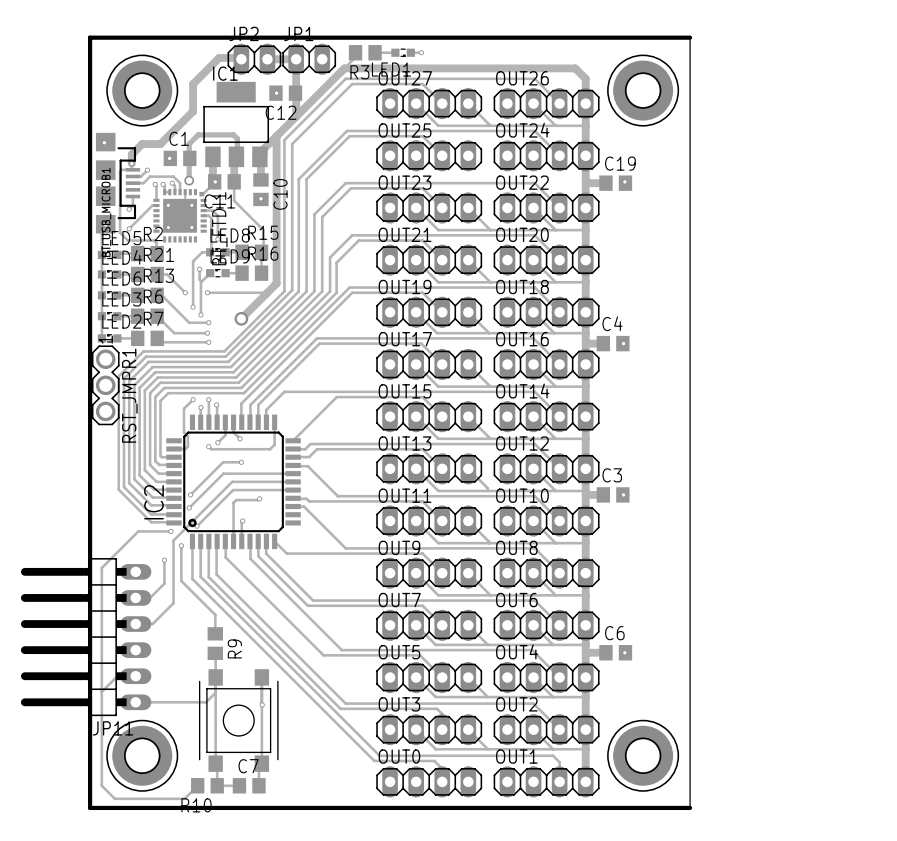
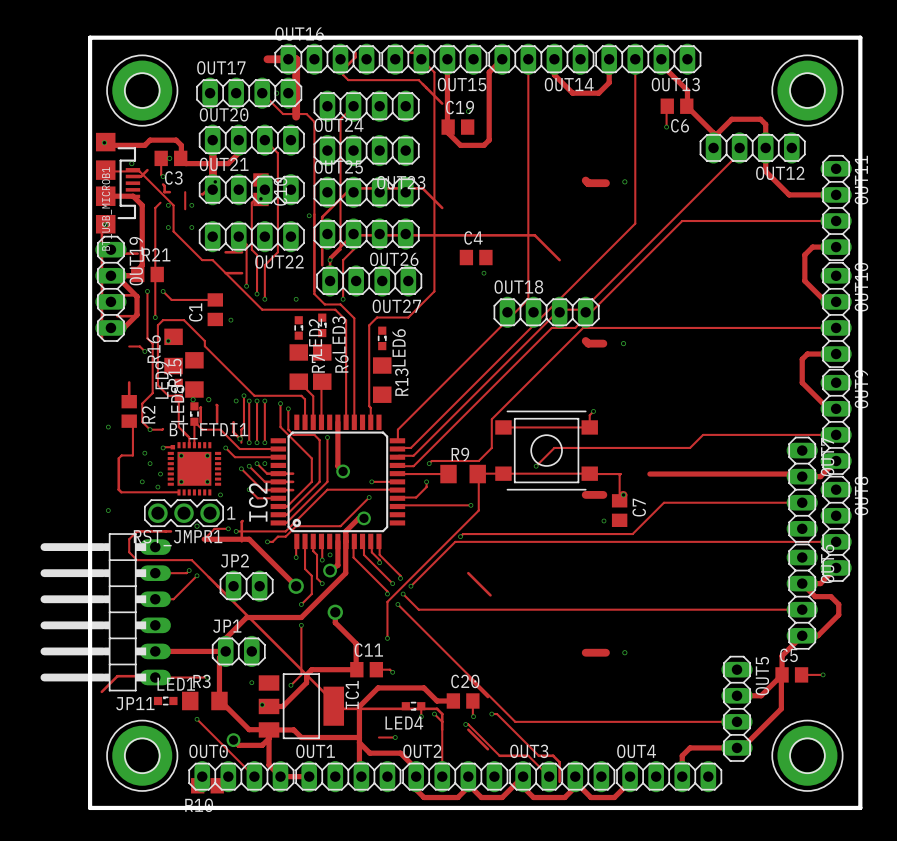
board edge: (690, 37) (690, 807) -> (690, 37) (860, 37) (860, 807) (690, 807)
R3 footprint: [348, 45, 382, 61] -> [182, 691, 228, 711]
track: (375, 52) (395, 52) -> none
LED1 rotation: 0° (403, 52) -> 180° (165, 700)
LED1 position: (403, 52) -> (165, 700)
via: (421, 52) -> none
track: (241, 59) (219, 57) (193, 84) (193, 111) (160, 144) (142, 144) (131, 154) (132, 169) (120, 171) (120, 232) (127, 240) (153, 240) (156, 243) (157, 253) -> none
JP2 position: (254, 59) -> (246, 586)
JP1 position: (309, 59) -> (238, 651)
track: none -> (421, 59) (434, 72) (434, 291) (408, 317) (377, 317) (369, 325) (370, 422)
track: none -> (447, 59) (448, 132) (460, 145) (483, 145) (489, 140) (489, 72) (502, 59)
track: none -> (528, 59) (528, 299) (397, 429) (397, 440)
track: none -> (554, 59) (554, 74) (572, 93) (598, 93) (609, 82) (609, 59)
track: none -> (635, 59) (635, 223) (410, 447) (397, 449)
track: none -> (661, 59) (661, 64) (687, 90) (686, 106) (713, 132) (713, 147)
R3 name position: R3 (359, 72) -> R3 (201, 681)
OUT27 name position: OUT27 (405, 78) -> OUT27 (396, 306)
OUT26 name position: OUT26 (522, 78) -> OUT26 (394, 259)
track: (422, 84) (352, 84) (292, 144) (292, 290) (225, 356) (146, 356) (123, 378) (123, 487) (151, 514) (173, 514) -> (422, 84) (418, 80) (348, 80) (343, 74) (343, 61) (340, 59)
part position: (643, 90) -> (807, 90)
C12: (285, 93) -> none
track: (416, 103) (438, 125) (585, 125) -> none
OUT27 position: (429, 103) -> (369, 281)
track: (468, 103) (490, 125) -> none
track: (533, 103) (555, 125) -> none
OUT26 position: (546, 103) -> (366, 234)
track: (559, 103) (534, 78) (345, 78) (284, 140) (284, 291) (224, 351) (143, 351) (118, 376) (118, 458) -> (129, 421) (132, 424) (132, 455) (121, 455) (118, 458)
track: none -> (353, 106) (340, 119) (340, 249) (330, 260)
track: none -> (667, 106) (666, 127)
via: none -> (468, 111)
IC1 rotation: 0° (236, 124) -> 90° clockwise (301, 706)
IC1 position: (236, 124) -> (301, 706)
via: none -> (666, 127)
track: (276, 136) (276, 283) (241, 318) -> none
track: none -> (713, 137) (731, 119) (760, 119) (765, 124) (765, 171) (789, 194) (836, 194)
C1 name position: C1 (179, 138) -> C1 (195, 312)
track: none -> (264, 140) (277, 153) (277, 252) (264, 265) (264, 299)
track: none -> (110, 145) (144, 145) (150, 140) (176, 140) (181, 145) (180, 158) (185, 163) (228, 163) (238, 153)
track: none -> (739, 147) (739, 153) (583, 309) (559, 309) (413, 455) (397, 457)
OUT25 position: (429, 155) -> (366, 192)
track: (442, 155) (422, 136) (349, 136) (306, 179) (306, 291) (230, 367) (152, 367) (134, 385) (134, 479) (152, 497) (173, 498) -> none
OUT24 position: (546, 155) -> (366, 150)
track: (559, 155) (534, 131) (347, 131) (298, 179) (298, 291) (228, 361) (148, 361) (129, 382) -> none
track: none -> (161, 158) (161, 174) (163, 176)
C1 rotation: 0° (180, 158) -> 90° clockwise (215, 309)
C1 position: (180, 158) -> (215, 309)
via: (147, 170) -> none
track: none -> (110, 171) (139, 171) (173, 205) (173, 231) (202, 260) (212, 260) (262, 309) (335, 309) (346, 320) (346, 422)
via: none -> (163, 176)
track: (260, 179) (259, 156) (263, 153) (263, 149) (344, 68) (575, 68) (585, 78) (585, 781) -> none
track: (189, 180) (189, 144) (198, 134) (233, 134) (237, 138) (237, 155) (234, 159) (234, 200) (263, 230) (261, 273) -> none
via: (189, 180) -> none
C11 position: (224, 181) -> (366, 669)
OUT22 name position: OUT22 (522, 182) -> OUT22 (279, 261)
track: (132, 183) (143, 183) (150, 176) (173, 176) (180, 183) (180, 192) -> none
track: (172, 183) (174, 185) (174, 192) -> none
via: (172, 183) -> none
C19 position: (615, 183) -> (457, 127)
track: (155, 184) (156, 200) -> none
via: (155, 184) -> none
via: (163, 184) -> none
track: none -> (264, 189) (251, 202) (251, 249) (257, 254) (257, 294)
track: (132, 196) (132, 205) (129, 209) -> none
track: none -> (110, 197) (133, 196) (142, 205) (142, 265) (131, 275) (110, 275)
C11 name position: C11 (219, 201) -> C11 (368, 650)
track: none -> (160, 202) (155, 207) (155, 317)
track: (156, 205) (152, 205) (129, 228) -> none
track: (416, 207) (438, 230) (585, 230) -> none
OUT23 position: (429, 207) -> (366, 106)
track: (468, 207) (490, 230) -> none
track: (533, 207) (555, 230) -> none
OUT22 position: (546, 207) -> (251, 236)
track: (559, 207) (534, 183) (345, 183) (314, 214) -> (262, 93) (283, 114) (306, 114) (314, 121) (314, 214)
via: (129, 209) -> none
track: (203, 210) (212, 210) (217, 215) (217, 239) -> none
BT_FTDI1 rotation: 0° (180, 215) -> 90° counterclockwise (194, 468)
BT_FTDI1 position: (180, 215) -> (194, 468)
track: (203, 215) (208, 215) (211, 218) (211, 251) (202, 252) (193, 261) (193, 307) -> none
via: none -> (309, 215)
track: none -> (836, 221) (682, 221) (575, 327) (551, 327) (413, 466) (397, 465)
via: (129, 228) -> none
R15 name position: R15 (263, 232) -> R15 (174, 372)
track: none -> (353, 234) (353, 249) (343, 260) (343, 299)
track: none -> (238, 236) (246, 244) (246, 286)
via: (217, 239) -> none
R15 footprint: [235, 244, 269, 261] -> [185, 352, 204, 398]
track: none -> (836, 247) (812, 247) (804, 254) (804, 281) (825, 301) (836, 301)
LED8 rotation: 0° (217, 252) -> 90° counterclockwise (194, 414)
LED8 position: (217, 252) -> (194, 414)
R2 rotation: 0° (147, 253) -> 90° clockwise (129, 411)
R2 position: (147, 253) -> (129, 411)
R16 name position: R16 (263, 253) -> R16 (154, 349)
LED5: (109, 254) -> none
via: none -> (330, 260)
track: (416, 260) (438, 282) (585, 282) -> none
OUT21 position: (429, 260) -> (251, 189)
track: (442, 260) (422, 240) (358, 240) (336, 262) (336, 292) (241, 387) (164, 387) (155, 397) (155, 460) (159, 464) (173, 465) -> none
track: (468, 260) (490, 282) -> none
track: (533, 260) (555, 282) -> none
OUT20 position: (546, 260) -> (251, 140)
R16 footprint: [235, 265, 269, 281] -> [164, 328, 183, 375]
track: (322, 265) (322, 291) (236, 377) (157, 377) (144, 390) (144, 470) (156, 481) (173, 481) -> none
track: (199, 269) (199, 279) (201, 281) -> none
via: (199, 269) -> none
track: (210, 273) (200, 282) (200, 314) -> none
LED9 rotation: 0° (217, 273) -> 90° counterclockwise (178, 390)
LED9 position: (217, 273) -> (178, 390)
via: none -> (483, 273)
LED4 rotation: 0° (109, 274) -> 180° (413, 706)
LED4 position: (109, 274) -> (413, 706)
track: (157, 274) (167, 274) (185, 292) -> none
track: none -> (116, 275) (137, 296) (137, 314) (123, 327) (110, 327)
R13 name position: R13 (158, 275) -> R13 (401, 382)
track: (330, 281) (330, 291) (238, 382) (160, 382) (150, 393) (150, 464) (158, 473) (173, 474) -> none
via: none -> (246, 286)
R13 footprint: [131, 287, 164, 304] -> [372, 357, 392, 403]
track: none -> (147, 291) (147, 338) (152, 343) (152, 393) (142, 403) (142, 421) (150, 429) (163, 429)
via: none -> (147, 291)
track: none -> (163, 291) (171, 299) (215, 299)
via: none -> (163, 291)
track: (314, 291) (233, 372) (155, 372) (139, 387) (139, 475) (153, 489) (173, 490) -> (314, 291) (314, 294) (324, 304) (340, 304) (354, 318) (354, 422)
via: (185, 292) -> none
track: (207, 292) (267, 292) -> none
via: (207, 292) -> none
via: none -> (257, 294)
LED6 rotation: 0° (109, 295) -> 90° clockwise (382, 338)
LED6 position: (109, 295) -> (382, 338)
track: (157, 295) (163, 296) (189, 322) (208, 322) -> none
R6 name position: R6 (153, 296) -> R6 (341, 363)
via: none -> (264, 299)
via: none -> (296, 299)
via: none -> (343, 299)
via: (193, 307) -> none
R6 footprint: [131, 308, 164, 324] -> [312, 344, 332, 390]
track: (416, 312) (437, 333) (585, 333) -> none
OUT19 rotation: 0° (429, 312) -> 90° clockwise (110, 288)
OUT19 position: (429, 312) -> (110, 288)
track: (442, 312) (422, 292) (352, 292) (241, 403) (241, 422) -> none
track: (468, 312) (489, 333) -> none
track: (533, 312) (554, 333) -> none
track: (559, 312) (534, 287) (349, 287) (243, 393) (168, 393) (160, 400) (160, 455) (173, 457) -> none
via: (200, 314) -> none
LED3 rotation: 0° (109, 316) -> 90° clockwise (322, 325)
LED3 position: (109, 316) -> (322, 325)
track: (157, 316) (174, 333) (207, 333) -> none
via: none -> (155, 317)
R7 name position: R7 (153, 318) -> R7 (318, 363)
via: (241, 318) -> none
via: none -> (230, 320)
via: (208, 322) -> none
track: none -> (836, 327) (583, 327) (491, 419) (491, 447) (478, 460) (431, 460) (429, 463)
R7 footprint: [131, 330, 164, 347] -> [289, 344, 309, 390]
via: (207, 333) -> none
LED2 rotation: 0° (109, 338) -> 90° clockwise (298, 327)
LED2 position: (109, 338) -> (298, 327)
track: (117, 338) (137, 338) -> none
track: (157, 338) (161, 342) (208, 342) -> none
via: none -> (168, 341)
via: (208, 342) -> none
C4 position: (613, 343) -> (476, 257)
track: none -> (129, 346) (139, 346) (144, 351)
via: none -> (144, 351)
track: none -> (836, 354) (807, 354) (802, 359) (802, 382) (828, 408) (836, 408)
track: (416, 364) (438, 386) (585, 386) -> none
OUT17 position: (429, 364) -> (249, 93)
track: (442, 364) (421, 343) (319, 343) (258, 404) (258, 422) -> none
track: (468, 364) (490, 386) -> none
track: (533, 364) (555, 386) -> none
OUT16 position: (546, 364) -> (327, 59)
track: (559, 364) (533, 338) (317, 338) (250, 404) (249, 422) -> none
track: none -> (298, 381) (313, 396) (313, 422)
track: none -> (322, 381) (321, 422)
RST_JMPR1 rotation: 0° (105, 385) -> 90° clockwise (183, 513)
RST_JMPR1 position: (105, 385) -> (183, 513)
OUT15 name position: OUT15 (405, 391) -> OUT15 (462, 84)
OUT14 name position: OUT14 (522, 391) -> OUT14 (569, 84)
track: none -> (243, 395) (243, 427) (241, 429) (241, 442)
via: none -> (243, 395)
track: (193, 399) (183, 408) (183, 432) -> (305, 422) (305, 399) (301, 395) (254, 395) (204, 346) (204, 341) (183, 320) (163, 320) (157, 325) (157, 385) (168, 395) (176, 395) (178, 398) (178, 427) (183, 432)
track: (208, 399) (208, 422) -> none
via: none -> (236, 400)
track: none -> (249, 400) (249, 442)
via: none -> (249, 400)
track: none -> (257, 400) (257, 442)
via: none -> (257, 400)
track: none -> (264, 400) (264, 442)
via: none -> (264, 400)
track: (129, 401) (129, 483) (151, 505) (173, 506) -> none
track: none -> (280, 403) (280, 427) (311, 458) (311, 481) (287, 506) (278, 506)
via: none -> (280, 403)
via: (216, 404) -> none
via: (200, 407) -> none
track: none -> (288, 408) (288, 429) (293, 434) (314, 434) (319, 440) (319, 481) (286, 514) (278, 514)
via: none -> (288, 408)
track: none -> (593, 411) (589, 415) (589, 427) (503, 427)
via: none -> (593, 411)
track: (416, 416) (438, 438) (585, 438) -> none
OUT15 position: (429, 416) -> (434, 59)
track: (442, 416) (422, 397) (336, 397) (293, 440) -> none
track: (468, 416) (490, 438) -> none
track: (533, 416) (554, 438) -> none
OUT14 position: (546, 416) -> (541, 59)
track: (559, 416) (534, 391) (284, 391) (266, 410) (266, 422) -> none
track: (225, 422) (225, 435) (217, 442) -> none
track: (274, 422) (274, 444) (270, 449) (211, 449) (208, 446) -> none
track: none -> (337, 422) (337, 466) (343, 471)
via: none -> (108, 427)
via: none -> (150, 429)
track: none -> (836, 434) (703, 434) (690, 447) (554, 447) (536, 466)
track: (187, 436) (187, 446) (185, 449) (173, 449) -> (187, 436) (189, 445)
track: none -> (327, 437) (327, 481) (286, 522) (278, 522)
via: none -> (327, 437)
via: (217, 442) -> none
via: none -> (249, 442)
via: none -> (257, 442)
via: none -> (264, 442)
OUT13 name position: OUT13 (405, 443) -> OUT13 (675, 84)
OUT12 name position: OUT12 (522, 443) -> OUT12 (780, 173)
track: none -> (194, 445) (194, 421) (202, 429) (220, 429) (239, 449) (278, 449)
via: (208, 446) -> none
via: none -> (163, 447)
track: none -> (172, 447) (163, 447)
track: none -> (225, 447) (234, 457) (278, 457)
via: none -> (225, 447)
track: (293, 449) (305, 449) (310, 444) (534, 444) (559, 468) -> none
part: none -> (546, 450)
via: none -> (144, 453)
via: none -> (181, 455)
via: none -> (207, 455)
track: (293, 457) (309, 457) (317, 449) (422, 449) (442, 468) -> none
track: none -> (836, 460) (820, 476) (802, 476) (799, 474) (649, 474)
track: (241, 462) (223, 462) (190, 494) -> none
via: (241, 462) -> none
via: none -> (150, 463)
via: none -> (257, 463)
via: none -> (264, 463)
via: none -> (429, 463)
track: (293, 465) (307, 466) (337, 496) (534, 496) (559, 520) -> none
via: none -> (249, 466)
via: none -> (536, 466)
via: none -> (241, 468)
track: (416, 468) (438, 490) (585, 490) -> none
OUT13 position: (429, 468) -> (648, 59)
track: (468, 468) (487, 488) (487, 490) -> none
track: (533, 468) (555, 490) -> none
OUT12 position: (546, 468) -> (752, 147)
via: none -> (343, 471)
track: (267, 473) (223, 473) (189, 507) -> (267, 473) (257, 463)
track: none -> (397, 473) (448, 474)
via: none -> (160, 474)
C3 name position: C3 (612, 475) -> C3 (173, 177)
via: none -> (142, 481)
via: none -> (181, 481)
via: none -> (207, 481)
IC2 position: (233, 481) -> (337, 481)
track: (264, 481) (232, 481) (173, 540) (173, 603) (152, 624) (135, 624) -> (264, 481) (249, 466)
track: none -> (371, 481) (397, 481)
via: none -> (371, 481)
track: none -> (426, 481) (426, 487) (416, 497) (397, 498)
via: none -> (426, 481)
via: none -> (157, 487)
track: none -> (249, 489) (257, 498) (278, 498)
via: none -> (249, 489)
track: (262, 490) (233, 490) (197, 526) -> (262, 490) (241, 468)
track: none -> (397, 490) (327, 489) (285, 531) (236, 531)
track: (121, 492) (151, 522) (173, 522) -> (121, 492) (178, 492)
via: (190, 494) -> none
via: none -> (220, 494)
C3 position: (613, 494) -> (170, 158)
track: none -> (369, 497) (340, 526) (296, 526) (285, 536) (277, 536) (272, 541) (267, 541)
via: none -> (369, 497)
track: (259, 498) (236, 500) (233, 502) (233, 541) -> none
via: (259, 498) -> none
track: (293, 498) (306, 498) (309, 501) (422, 501) (442, 520) -> none
track: none -> (619, 500) (620, 474) (478, 473) (478, 510) (387, 601) (387, 638)
track: none -> (802, 502) (663, 502) (632, 534) (463, 534) (460, 536)
track: none -> (470, 505) (397, 506)
via: none -> (470, 505)
track: (293, 506) (303, 506) (345, 548) (534, 548) (559, 573) -> none
via: (189, 507) -> none
via: none -> (108, 510)
track: none -> (363, 518) (358, 518) (345, 531) (345, 573) (301, 617) (246, 617) (225, 638) (225, 651)
via: none -> (363, 518)
via: (242, 520) -> none
track: (416, 520) (438, 543) (585, 543) -> none
OUT11 rotation: 0° (429, 520) -> 90° clockwise (836, 207)
OUT11 position: (429, 520) -> (836, 207)
track: (468, 520) (489, 543) -> none
track: (533, 520) (555, 543) -> none
OUT10 rotation: 0° (546, 520) -> 90° clockwise (836, 314)
OUT10 position: (546, 520) -> (836, 314)
via: none -> (603, 520)
track: none -> (228, 528) (214, 528) (204, 539) (249, 539) (296, 586)
via: none -> (228, 528)
track: (138, 531) (101, 567) (101, 785) (114, 798) (184, 798) (197, 785) -> none
via: (170, 531) -> none
via: none -> (236, 531)
via: none -> (460, 536)
track: (192, 541) (192, 579) (374, 760) (434, 760) (442, 768) -> (442, 729) (442, 768)
track: (200, 541) (200, 576) (379, 755) (499, 755) -> (465, 724) (468, 724) (499, 755)
track: (208, 541) (208, 577) -> (138, 531) (129, 539) (129, 552) (137, 560) (191, 560) (208, 577)
track: (217, 541) (216, 574) (345, 703) (533, 703) (559, 729) -> none
track: (225, 541) (225, 557) (323, 655) (420, 655) (442, 677) -> none
track: (249, 541) (250, 558) (341, 650) (532, 650) (559, 677) -> none
track: (258, 541) (258, 556) (307, 605) (422, 605) (442, 625) -> none
track: (266, 541) (266, 553) (313, 600) (534, 600) (559, 625) -> none
via: none -> (267, 541)
track: (274, 541) (286, 553) (422, 553) (442, 573) -> none
track: none -> (296, 541) (296, 557)
track: none -> (305, 541) (305, 569) (311, 575) (311, 594) (301, 604)
track: none -> (313, 541) (313, 551) (317, 554) (317, 578) (322, 583)
track: none -> (321, 541) (322, 560)
track: none -> (337, 541) (337, 565) (330, 570)
track: none -> (354, 541) (353, 557) (387, 591) (387, 594)
track: none -> (362, 541) (363, 554) (392, 583)
track: none -> (370, 541) (371, 552) (379, 560) (379, 562)
track: none -> (378, 541) (379, 554) (400, 575) (400, 578)
track: none -> (836, 541) (455, 541) (410, 586)
track: (181, 545) (181, 580) (215, 614) (215, 633) -> none
via: (181, 545) -> none
via: none -> (330, 554)
via: none -> (296, 557)
track: (164, 560) (164, 583) (148, 599) (135, 597) -> none
via: (164, 560) -> none
via: none -> (322, 560)
via: none -> (379, 562)
track: none -> (836, 567) (820, 583) (802, 583) (815, 596) (830, 596) (838, 604) (838, 614) (817, 635) (802, 635) (782, 655) (782, 674) (761, 695) (737, 695)
track: none -> (189, 570) (186, 573) (155, 573)
via: none -> (189, 570)
via: none -> (330, 570)
track: (416, 573) (438, 595) (585, 595) -> none
OUT9 rotation: 0° (429, 573) -> 90° clockwise (836, 421)
OUT9 position: (429, 573) -> (836, 421)
track: (533, 573) (555, 595) -> none
OUT8 rotation: 0° (546, 573) -> 90° clockwise (836, 528)
OUT8 position: (546, 573) -> (836, 528)
track: none -> (197, 575) (173, 599) (155, 599)
via: none -> (197, 575)
via: none -> (400, 578)
via: none -> (322, 583)
via: none -> (392, 583)
via: none -> (296, 586)
via: none -> (410, 586)
via: none -> (387, 594)
track: none -> (403, 594) (418, 609) (802, 609)
via: none -> (403, 594)
via: none -> (301, 604)
track: none -> (397, 604) (515, 721) (737, 721)
via: none -> (397, 604)
track: none -> (335, 612) (335, 622) (356, 643) (356, 669) (311, 669) (306, 674) (306, 682) (282, 706) (269, 706)
via: none -> (335, 612)
track: none -> (301, 625) (301, 674) (290, 685)
via: none -> (301, 625)
track: (416, 625) (435, 644) (585, 644) -> none
OUT7 rotation: 0° (429, 625) -> 90° clockwise (802, 489)
OUT7 position: (429, 625) -> (802, 489)
track: (468, 625) (487, 644) -> none
track: (533, 625) (553, 644) -> none
OUT6 rotation: 0° (546, 625) -> 90° clockwise (802, 596)
OUT6 position: (546, 625) -> (802, 596)
R9 footprint: [207, 627, 223, 661] -> [440, 464, 486, 484]
C6 name position: C6 (614, 633) -> C6 (680, 125)
JP11 position: (86, 637) -> (105, 612)
via: none -> (387, 638)
R9 name position: R9 (234, 648) -> R9 (460, 454)
track: none -> (155, 651) (225, 651)
track: none -> (225, 651) (219, 657) (219, 700) (249, 729) (269, 729)
C6 position: (615, 652) -> (677, 106)
track: (215, 653) (217, 785) (239, 785) -> none
track: none -> (376, 669) (390, 669) (392, 672)
via: none -> (392, 672)
C5: none -> (791, 674)
track: none -> (801, 674) (823, 674)
via: none -> (823, 674)
track: none -> (781, 675) (781, 708) (742, 747) (690, 747) (682, 755) (682, 776)
track: none -> (155, 677) (207, 677)
via: none -> (207, 677)
track: (215, 677) (215, 693) (206, 702) (135, 702) -> none
track: (261, 677) (261, 763) (258, 766) (258, 785) -> none
track: (416, 677) (435, 697) (585, 697) -> none
OUT5 rotation: 0° (429, 677) -> 90° clockwise (737, 708)
OUT5 position: (429, 677) -> (737, 708)
track: (533, 677) (553, 697) -> none
OUT4 position: (546, 677) -> (669, 776)
via: none -> (251, 682)
via: none -> (290, 685)
track: none -> (453, 700) (437, 700) (423, 687) (378, 687) (359, 706) (359, 774) (361, 776)
C20: none -> (463, 700)
track: none -> (472, 700) (473, 716)
track: none -> (421, 706) (421, 716)
track: none -> (434, 714) (442, 721)
via: none -> (434, 714)
track: none -> (491, 714) (497, 714) (538, 755)
via: none -> (491, 714)
via: none -> (421, 716)
via: none -> (473, 716)
track: none -> (197, 719) (254, 776)
via: none -> (197, 719)
part: (238, 720) -> none
via: none -> (465, 724)
track: none -> (269, 729) (293, 729) (301, 737) (359, 737)
track: none -> (269, 729) (269, 765) (280, 776) (309, 776)
track: (416, 729) (435, 749) (585, 749) -> none
OUT3 position: (429, 729) -> (562, 776)
track: (533, 729) (553, 749) -> none
OUT2 position: (546, 729) -> (455, 776)
track: none -> (378, 737) (395, 737)
via: none -> (395, 737)
track: none -> (269, 738) (262, 745) (238, 745) (233, 740)
via: none -> (233, 740)
track: none -> (359, 742) (369, 753) (400, 753) (416, 768) (416, 789) (423, 797) (457, 797) (468, 787) (468, 776)
track: (528, 755) (538, 755) -> (528, 755) (549, 776)
part position: (643, 755) -> (807, 755)
track: none -> (575, 776) (575, 787) (564, 797) (533, 797) (523, 787) (523, 776) (502, 797) (481, 797) (468, 784)
track: none -> (630, 776) (630, 781) (614, 797) (590, 797) (575, 781)
OUT0 position: (429, 781) -> (241, 776)
OUT1 position: (546, 781) -> (348, 776)
C7 rotation: 0° (249, 785) -> 90° clockwise (619, 510)
C7 position: (249, 785) -> (619, 510)

